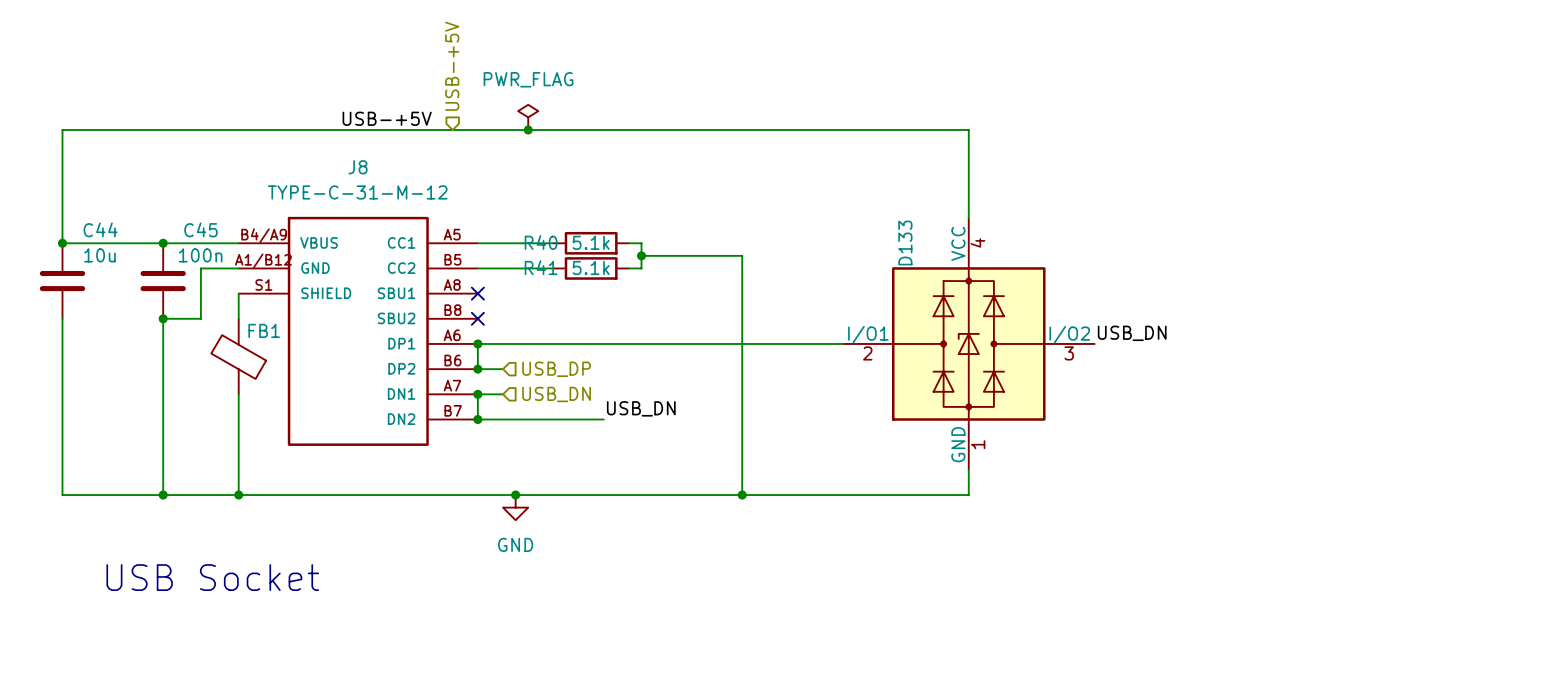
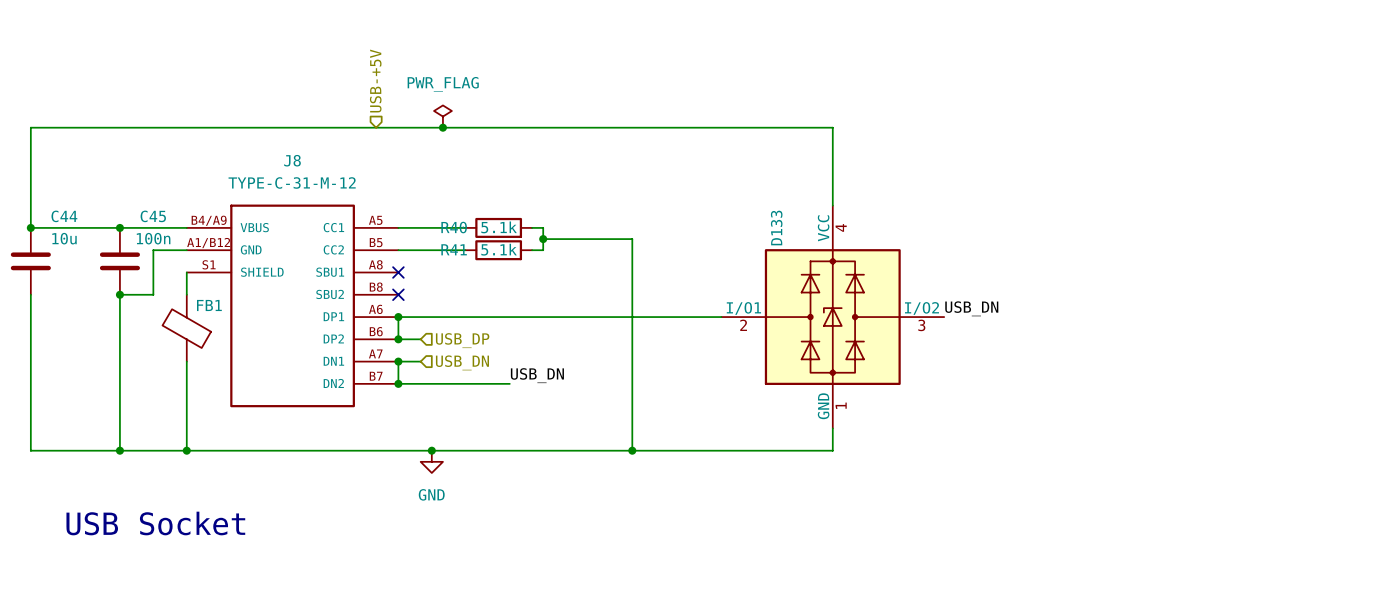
label: USB-+5V (387, 118) -> none

